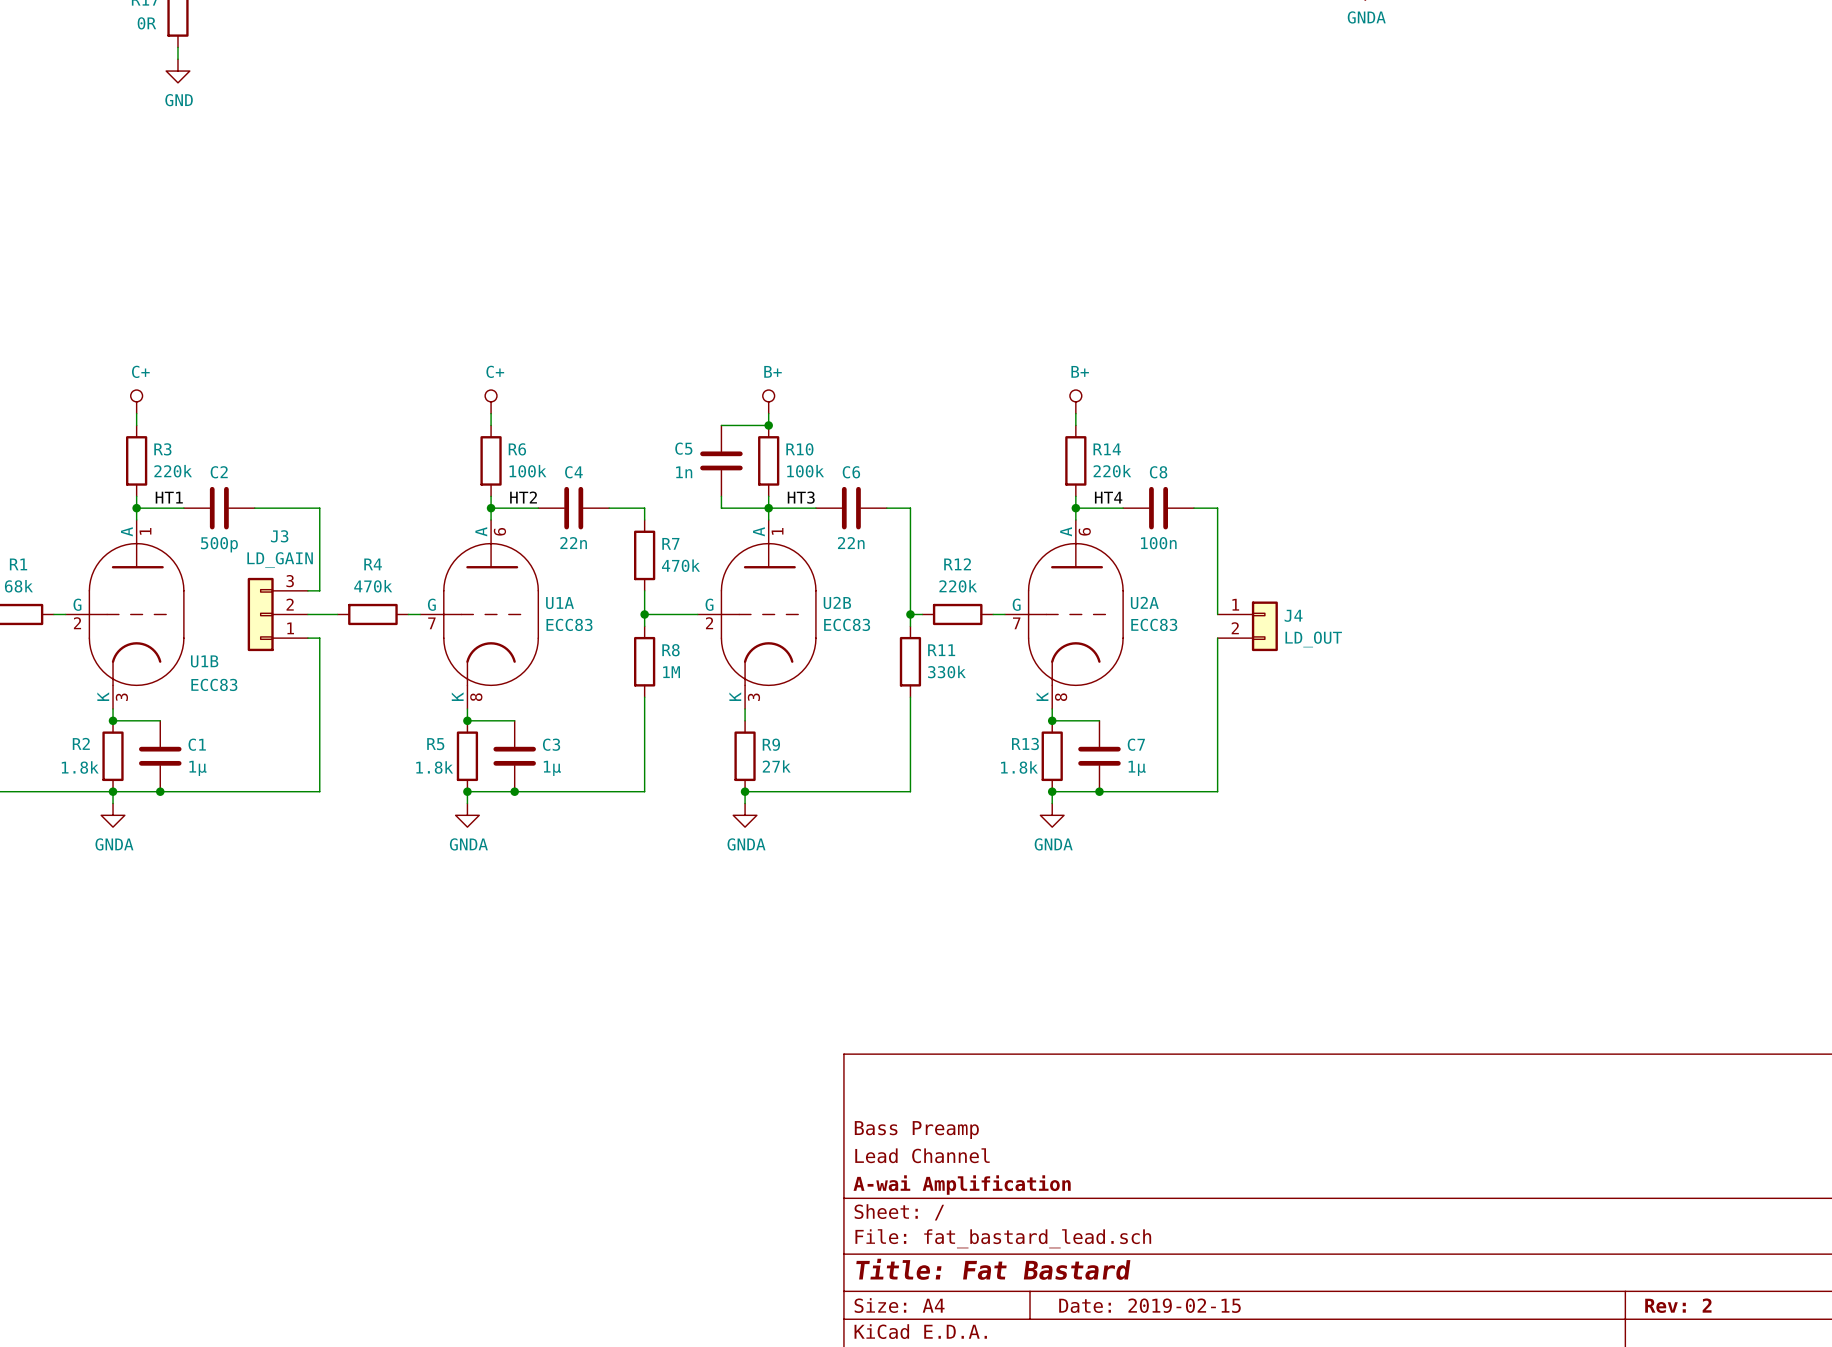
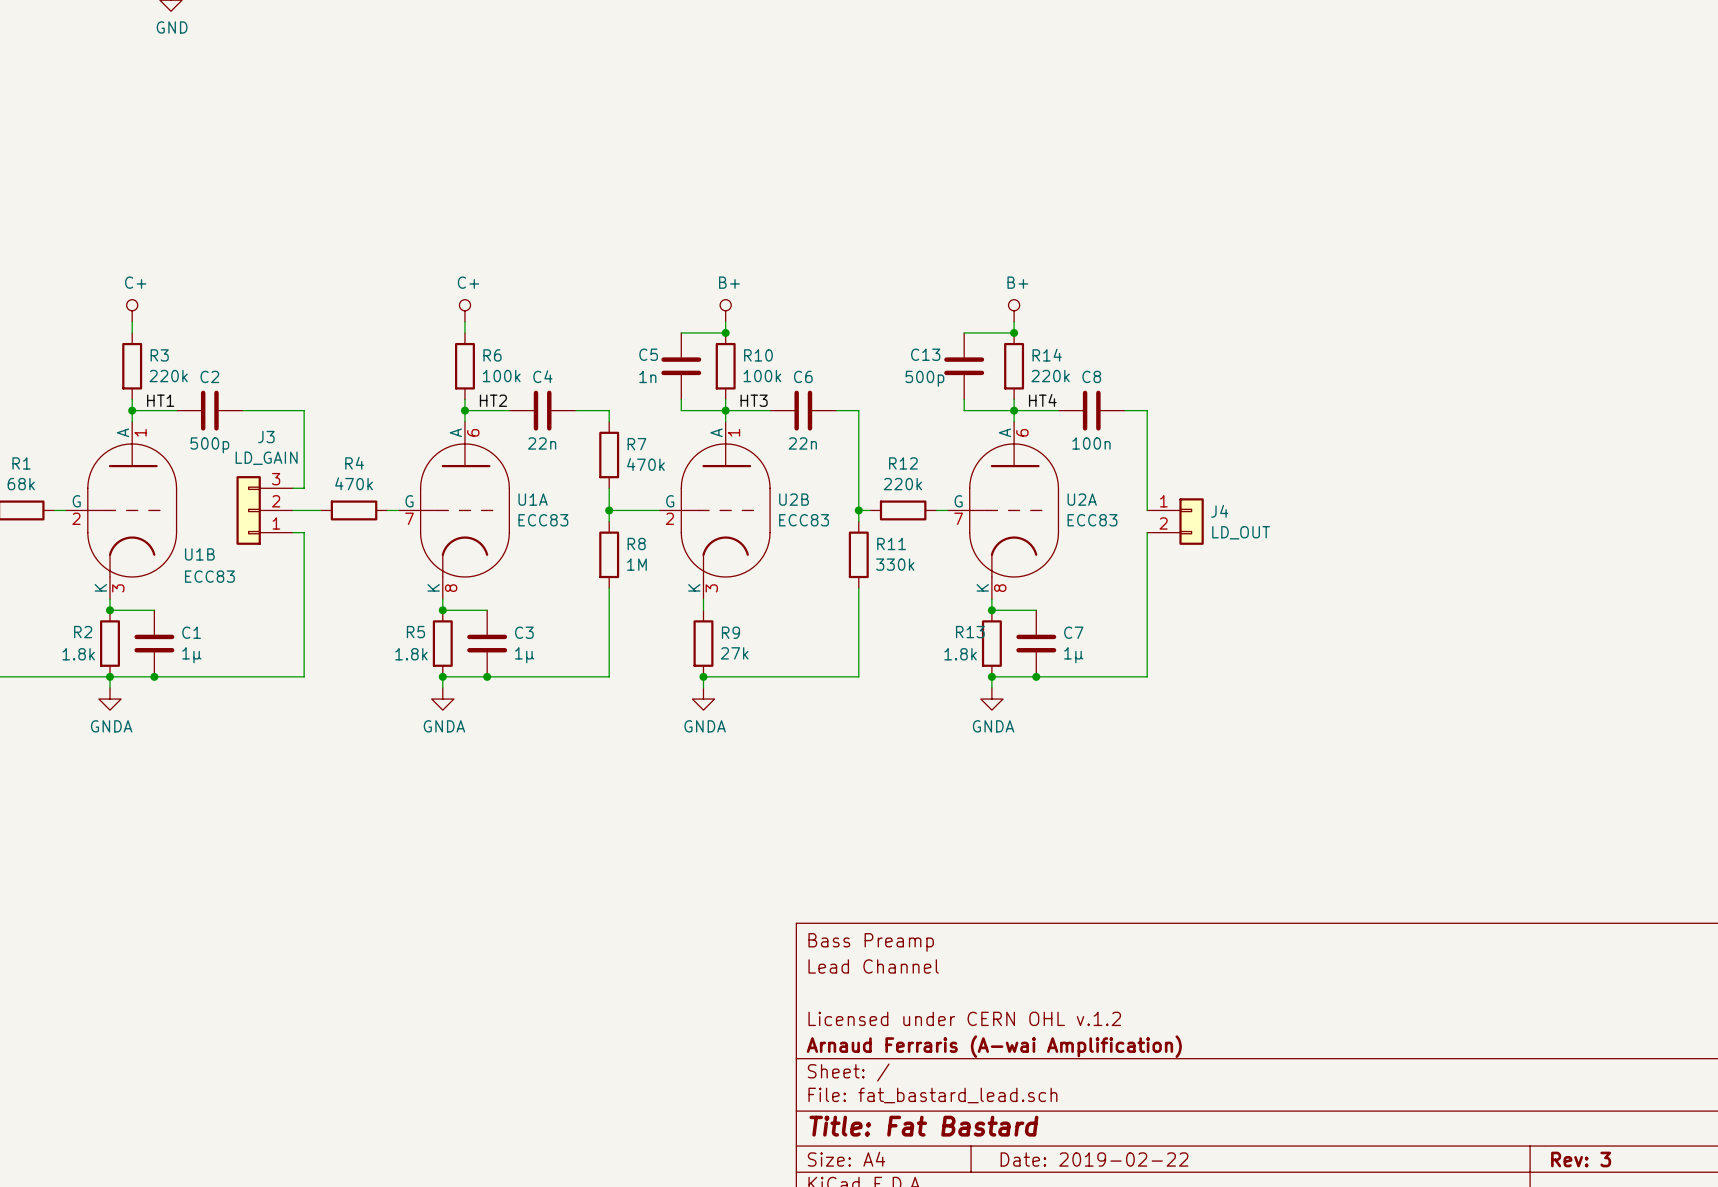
wire: none -> (964, 332) (1014, 332)
junction: none -> (1014, 332)
C13: none -> 500p (964, 366)
wire: none -> (964, 399) (964, 410) (1014, 410)
title block: none -> Lead Channel (873, 966)
title block position: Bass Preamp (916, 1130) -> Bass Preamp (871, 942)
title block: Lead Channel (922, 1155) -> Licensed under CERN OHL v.1.2 (964, 1018)
title block: A-wai Amplification (962, 1185) -> Arnaud Ferraris (A-wai Amplification) (994, 1046)
title block: Date: 2019-02-15 (1149, 1305) -> Date: 2019-02-22 (1094, 1159)
title block: Rev: 2 (1678, 1305) -> Rev: 3 (1581, 1159)

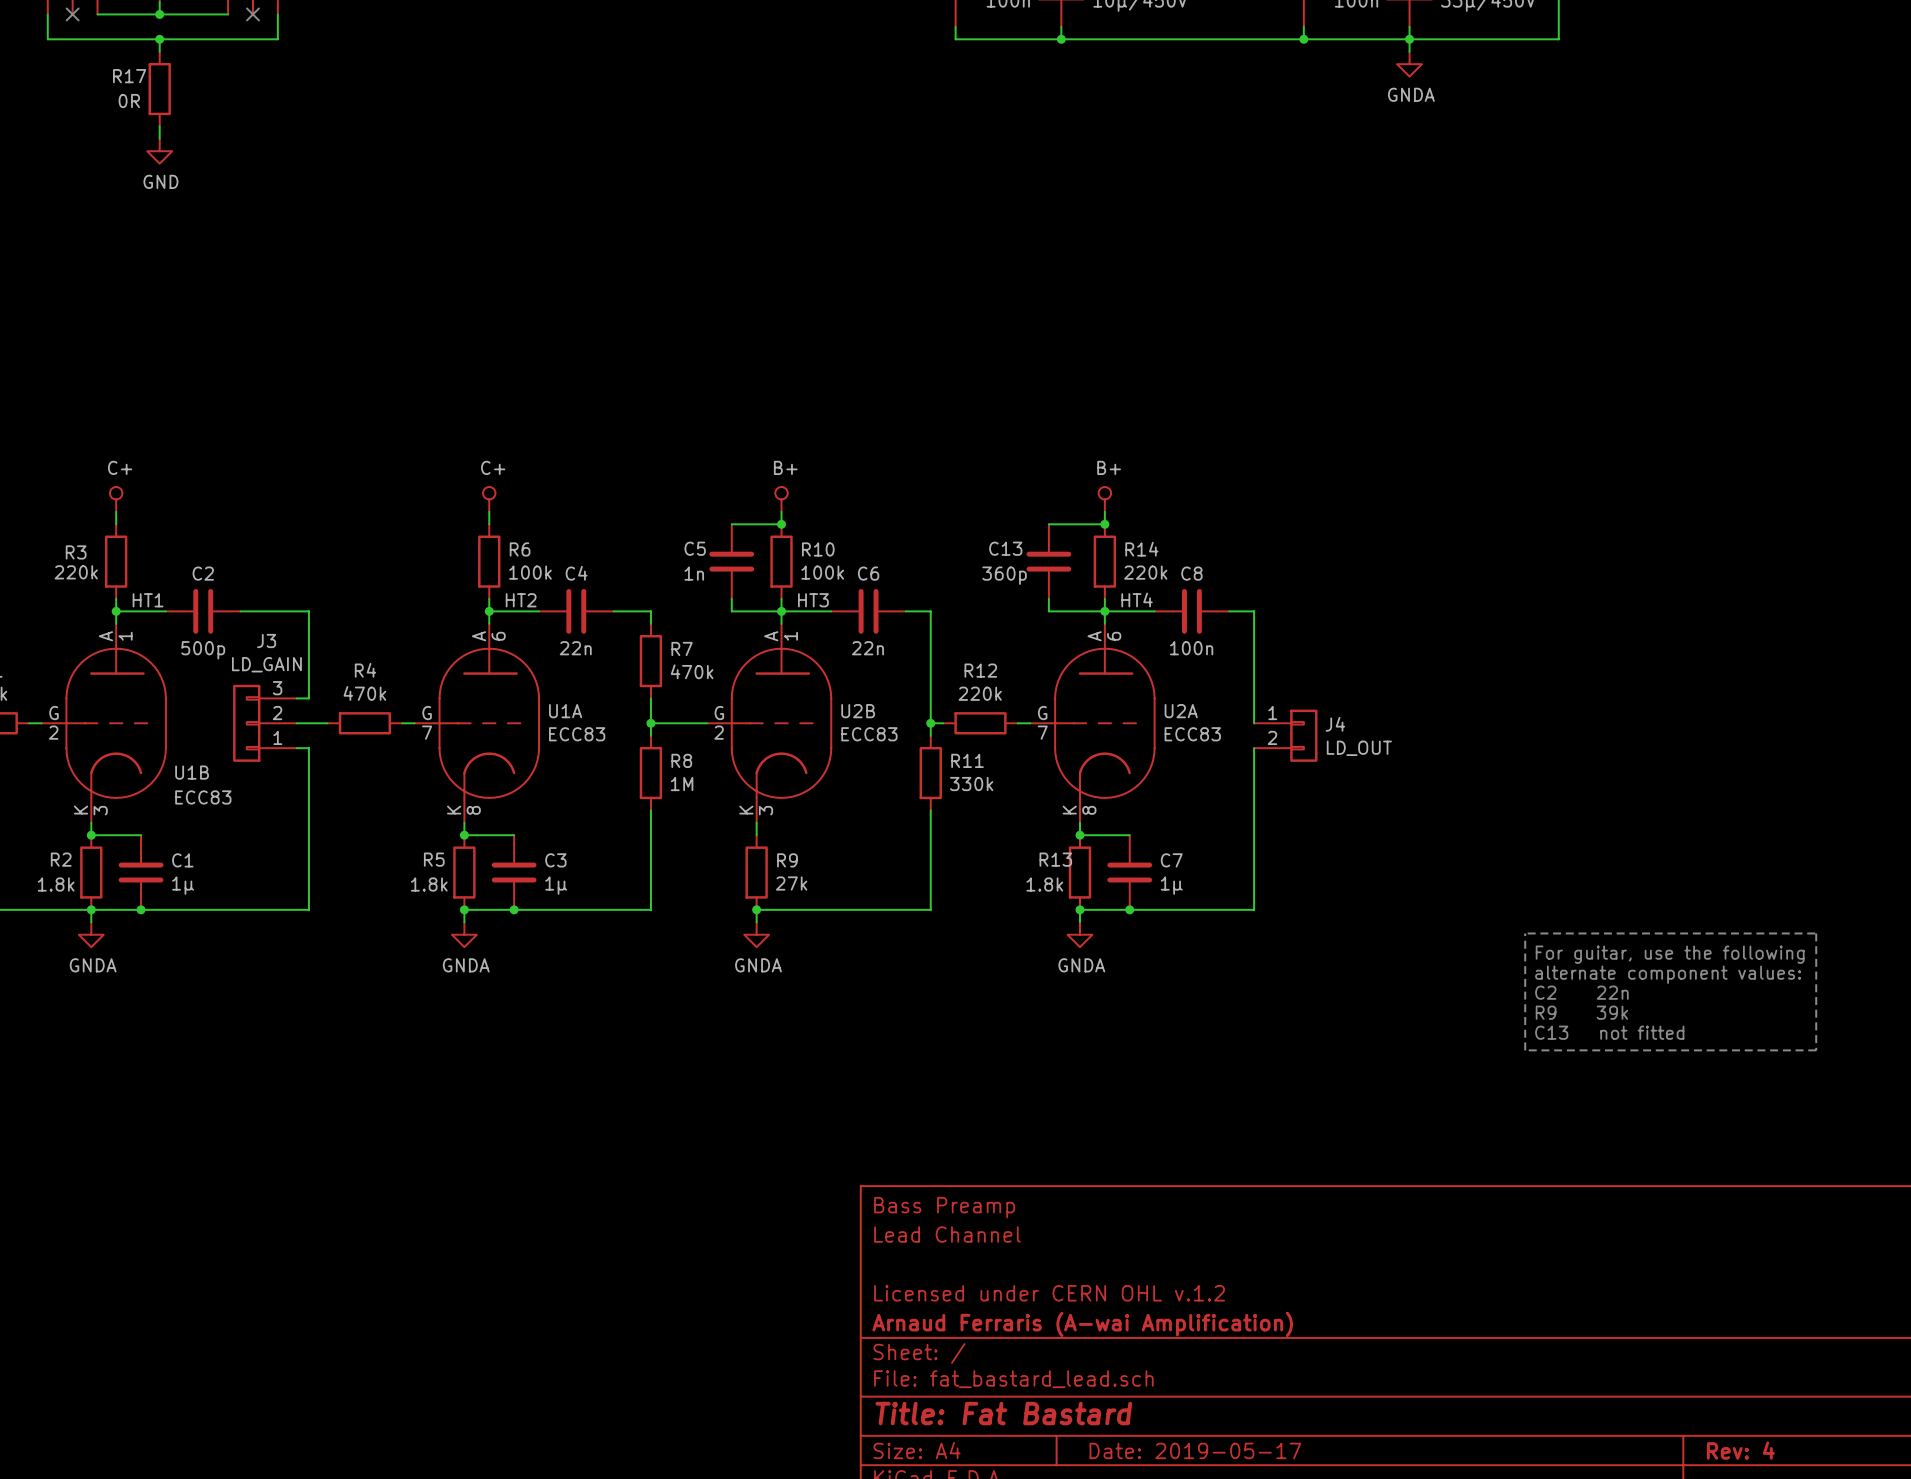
R3 name position: R3 (159, 355) -> R3 (76, 552)
R3 value position: 220k (168, 376) -> 220k (76, 572)
C13 value: 500p (924, 378) -> 360p (1004, 575)
line: none -> (1525, 933) (1525, 1050) (1816, 1050) (1816, 933) (1527, 933)
text: none -> For guitar, use the following (1670, 954)
text: none -> alternate component values: (1668, 974)
text: none -> C2 22n (1581, 992)
text: none -> R9 39k (1581, 1012)
text: none -> C13 not fitted (1609, 1032)
title block: Date: 2019-02-22 (1094, 1159) -> Date: 2019-05-17 (1195, 1450)
title block: Rev: 3 (1581, 1159) -> Rev: 4 (1740, 1450)

